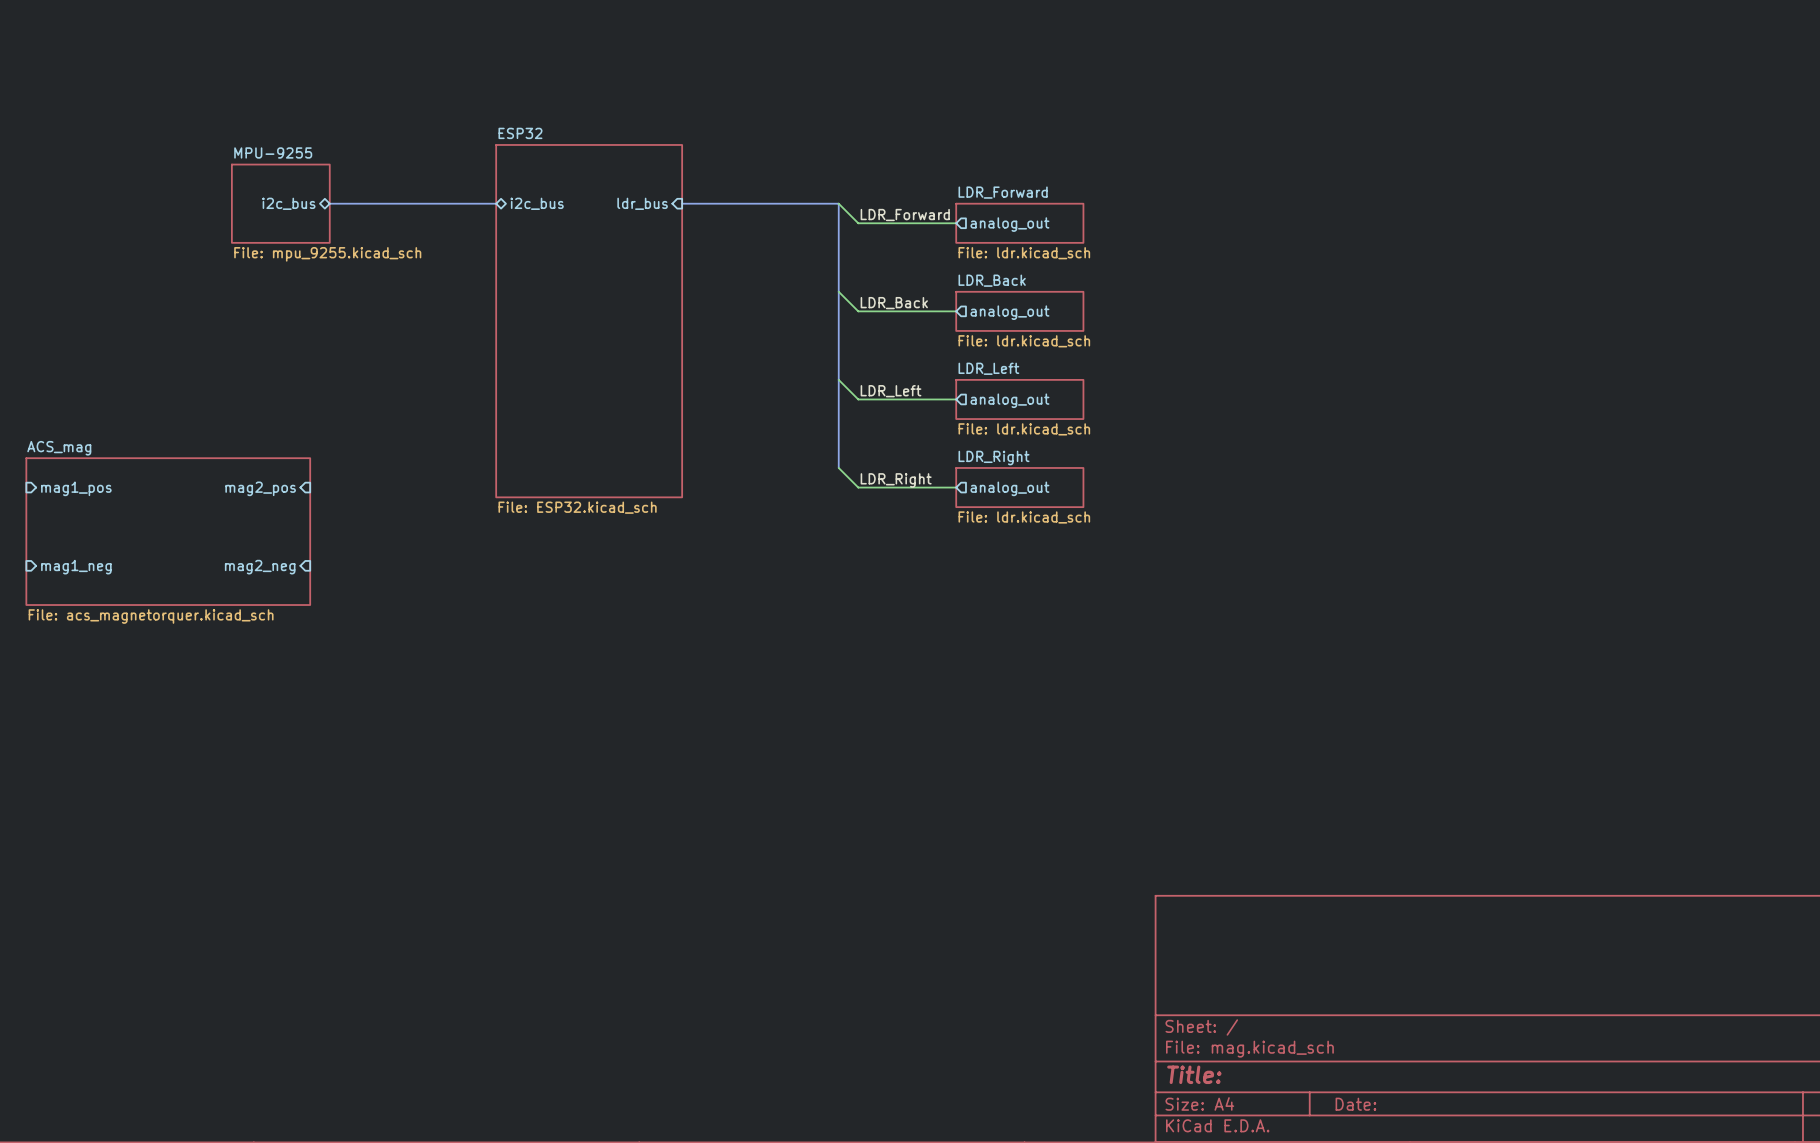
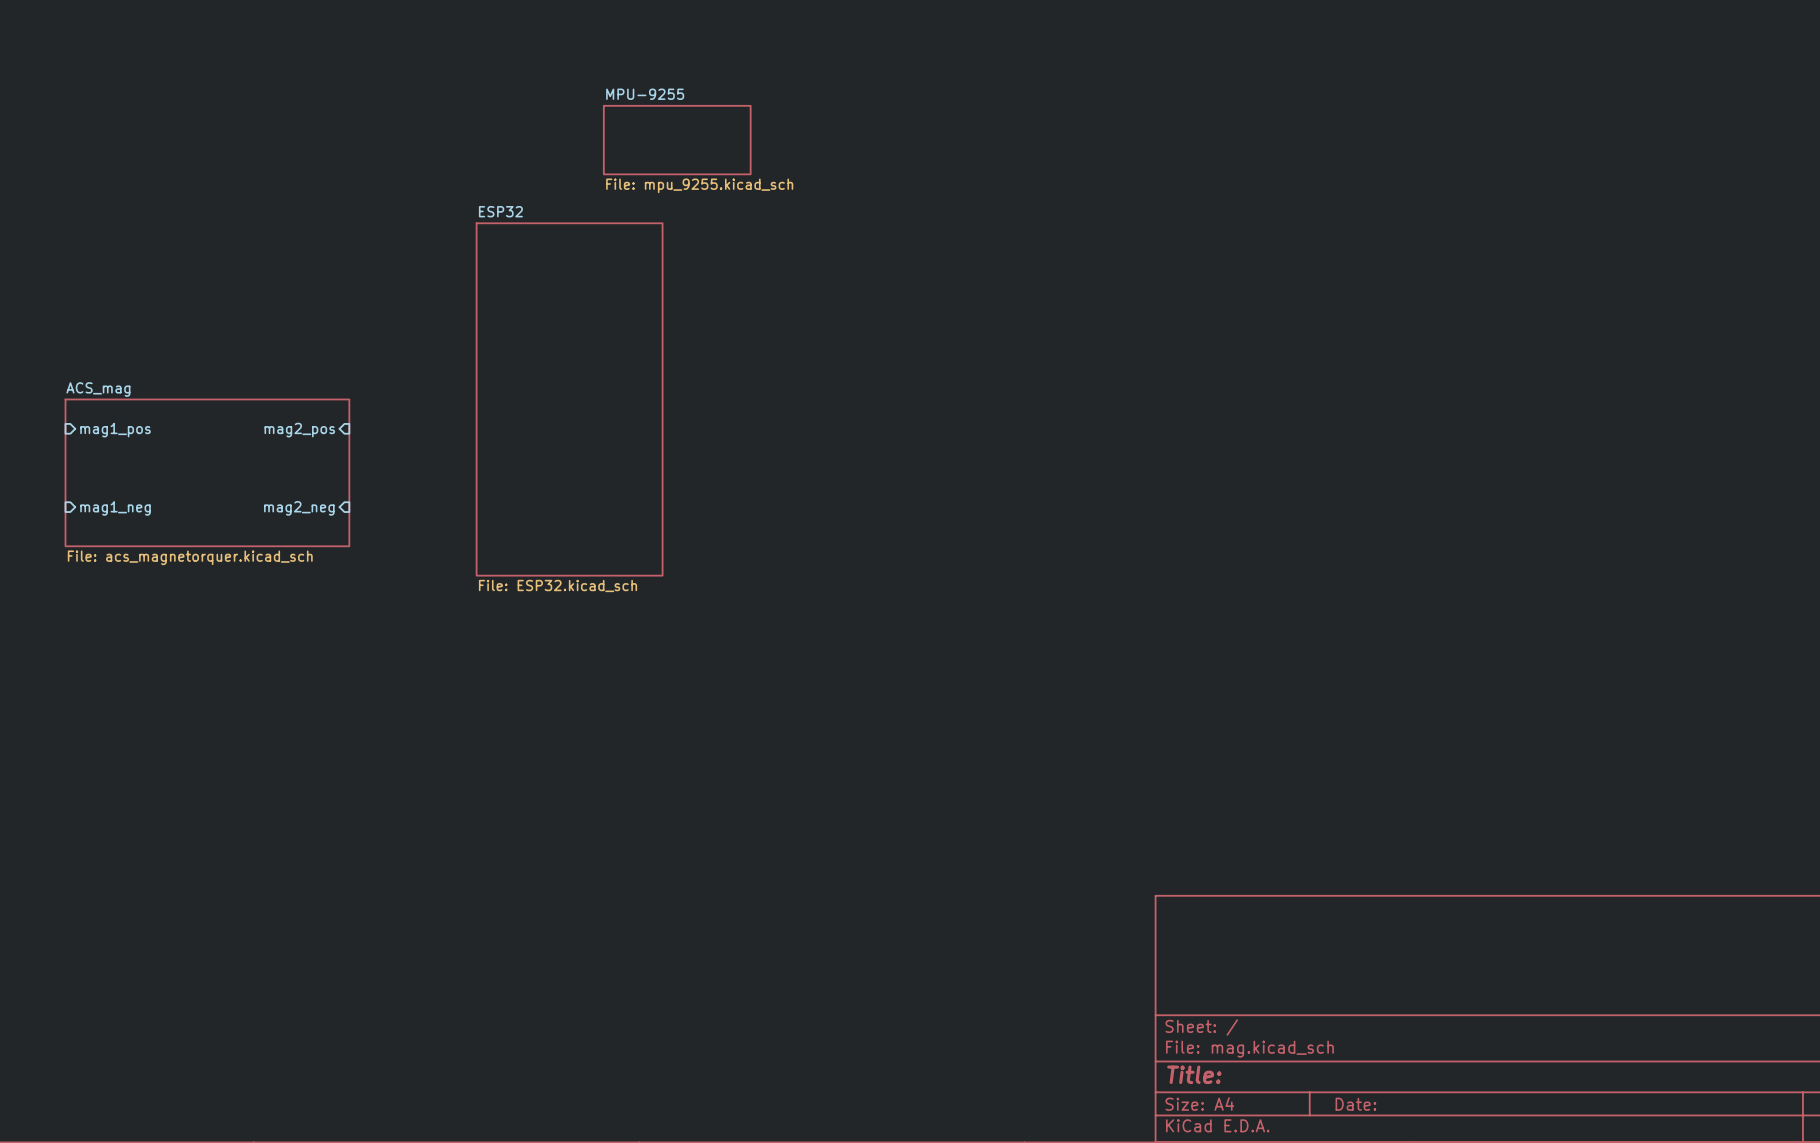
sheet MPU-9255 name position: MPU-9255 (273, 152) -> MPU-9255 (645, 94)
sheet MPU-9255 shape: [231, 163, 331, 244] -> [603, 105, 752, 175]
sheet pin: i2c_bus (288, 203) -> none
bus: (329, 203) (496, 203) -> none
sheet pin: i2c_bus (537, 203) -> none
sheet pin: ldr_bus (642, 203) -> none
bus: (682, 203) (838, 203) (838, 467) -> none
wire: (838, 203) (858, 223) (956, 223) -> none
label: LDR_Forward (905, 215) -> none
sheet LDR_Forward: File: ldr.kicad_sch (1019, 223) -> none
sheet pin: analog_out (1009, 224) -> none
sheet MPU-9255 value position: File: mpu_9255.kicad_sch (327, 254) -> File: mpu_9255.kicad_sch (699, 185)
wire: (838, 291) (858, 311) (956, 311) -> none
label: LDR_Back (894, 303) -> none
sheet LDR_Back: File: ldr.kicad_sch (1019, 311) -> none
sheet pin: analog_out (1009, 312) -> none
sheet ESP32 position: (589, 321) -> (569, 399)
wire: (838, 379) (858, 399) (956, 399) -> none
label: LDR_Left (891, 391) -> none
sheet LDR_Left: File: ldr.kicad_sch (1019, 399) -> none
sheet pin: analog_out (1009, 400) -> none
wire: (838, 467) (858, 487) (956, 487) -> none
label: LDR_Right (896, 480) -> none
sheet LDR_Right: File: ldr.kicad_sch (1019, 487) -> none
sheet pin position: mag1_pos (76, 488) -> mag1_pos (115, 430)
sheet pin position: mag2_pos (260, 488) -> mag2_pos (299, 430)
sheet pin: analog_out (1009, 488) -> none
sheet ACS_mag position: (168, 531) -> (207, 472)
sheet pin position: mag1_neg (76, 567) -> mag1_neg (115, 508)
sheet pin position: mag2_neg (260, 567) -> mag2_neg (299, 508)

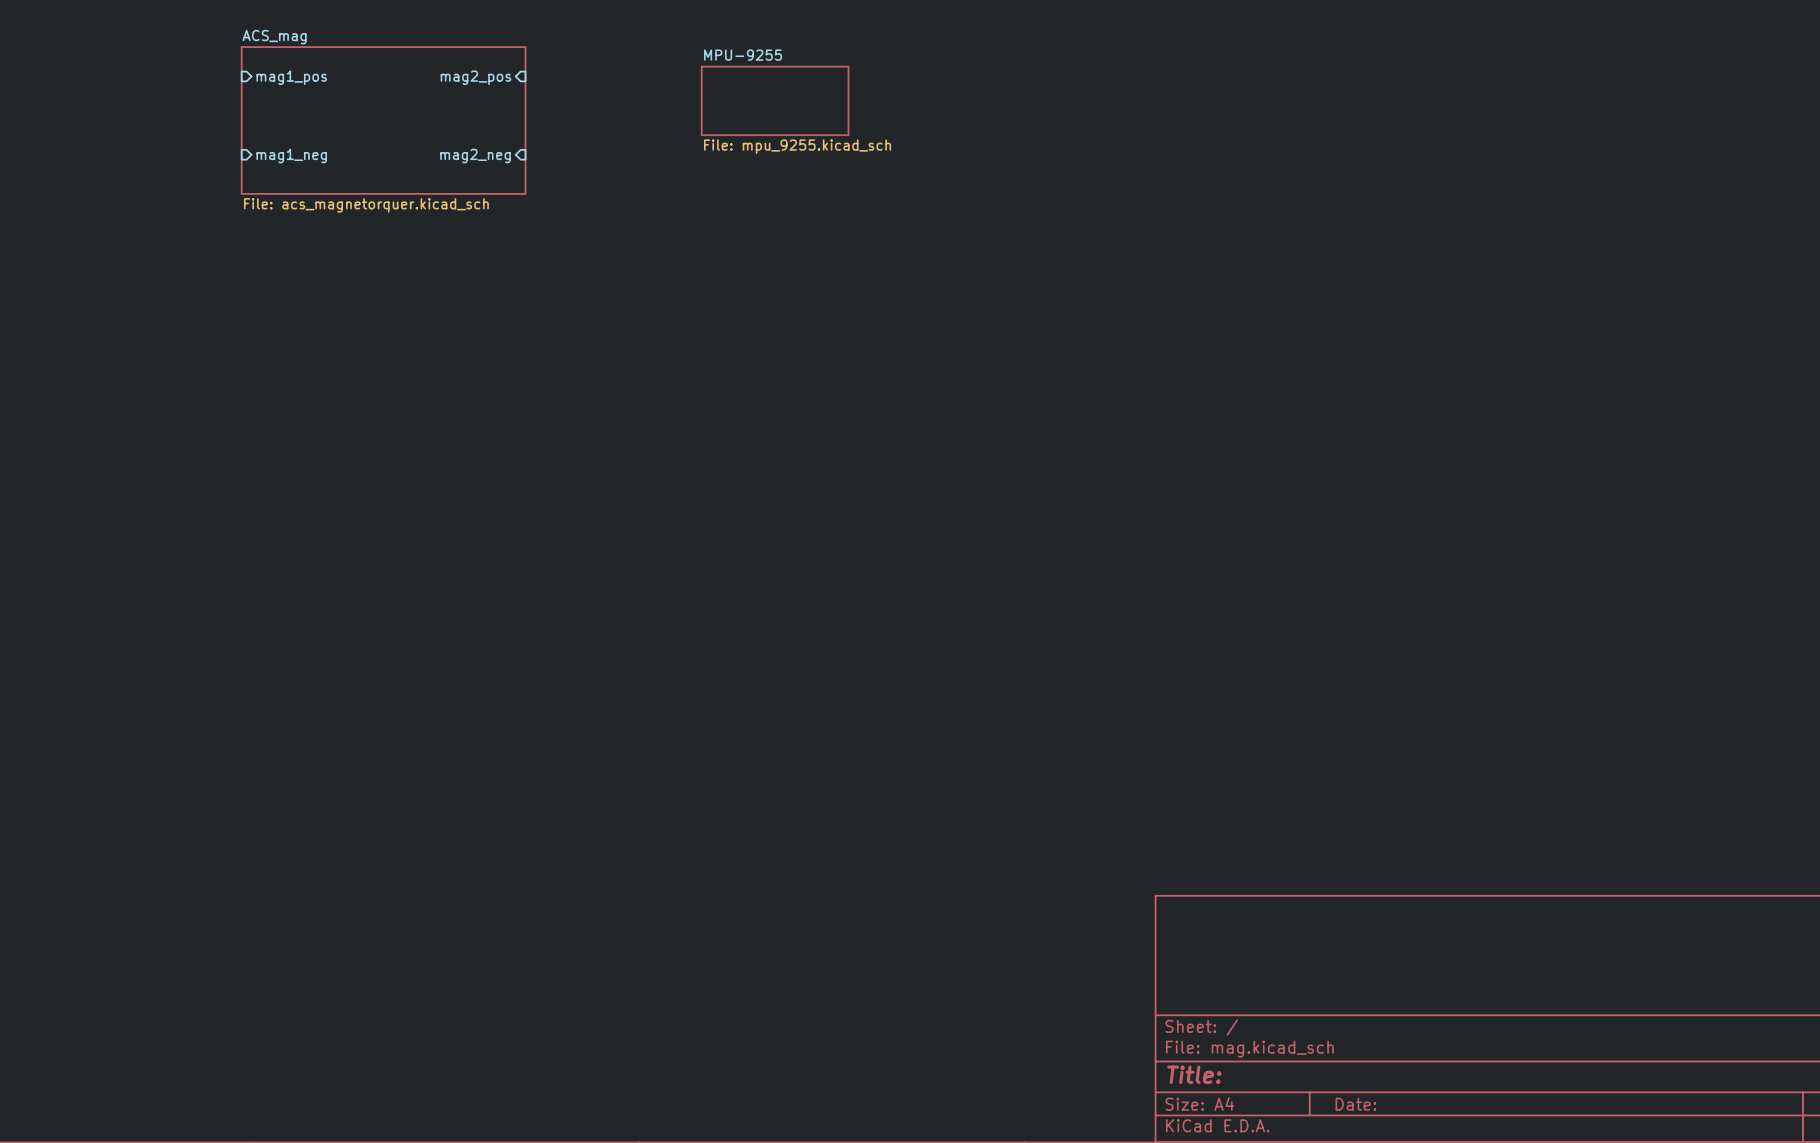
sheet pin: none -> mag1_pos (291, 77)
sheet pin: none -> mag2_pos (475, 77)
sheet ACS_mag: none -> File: acs_magnetorquer.kicad_sch (383, 120)
sheet MPU-9255 position: (677, 140) -> (775, 100)
sheet pin: none -> mag1_neg (291, 156)
sheet pin: none -> mag2_neg (475, 156)
sheet ESP32: File: ESP32.kicad_sch (569, 399) -> none
sheet pin: mag1_pos (115, 430) -> none
sheet pin: mag2_pos (299, 430) -> none
sheet ACS_mag: File: acs_magnetorquer.kicad_sch (207, 472) -> none
sheet pin: mag1_neg (115, 508) -> none
sheet pin: mag2_neg (299, 508) -> none

